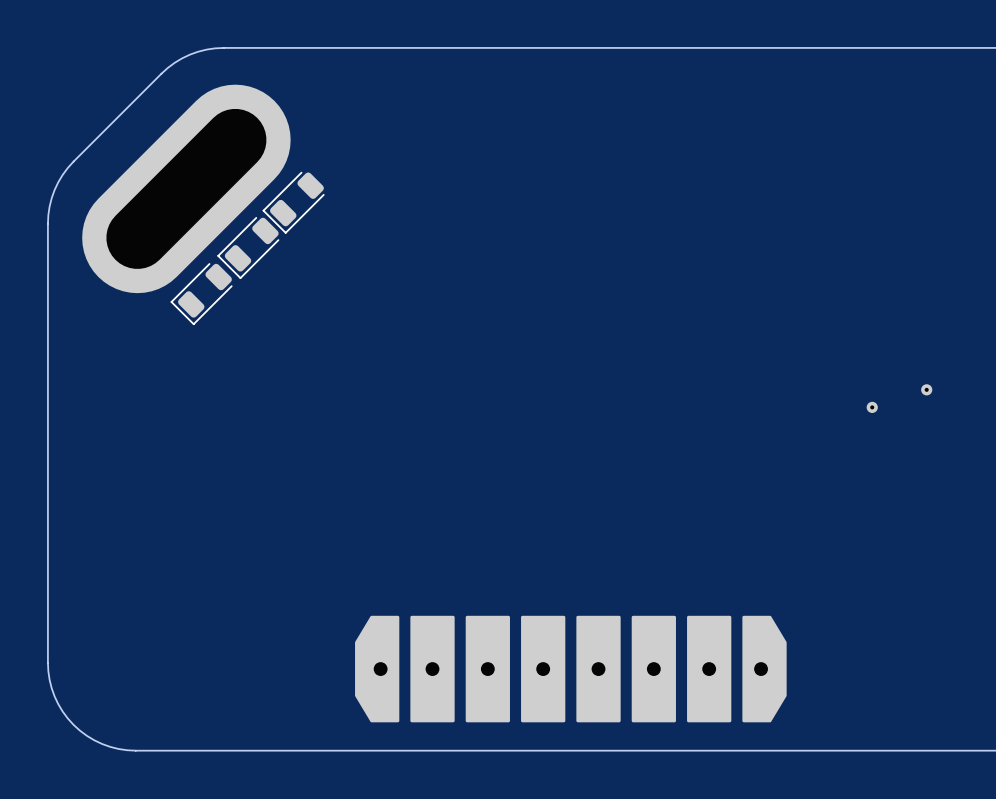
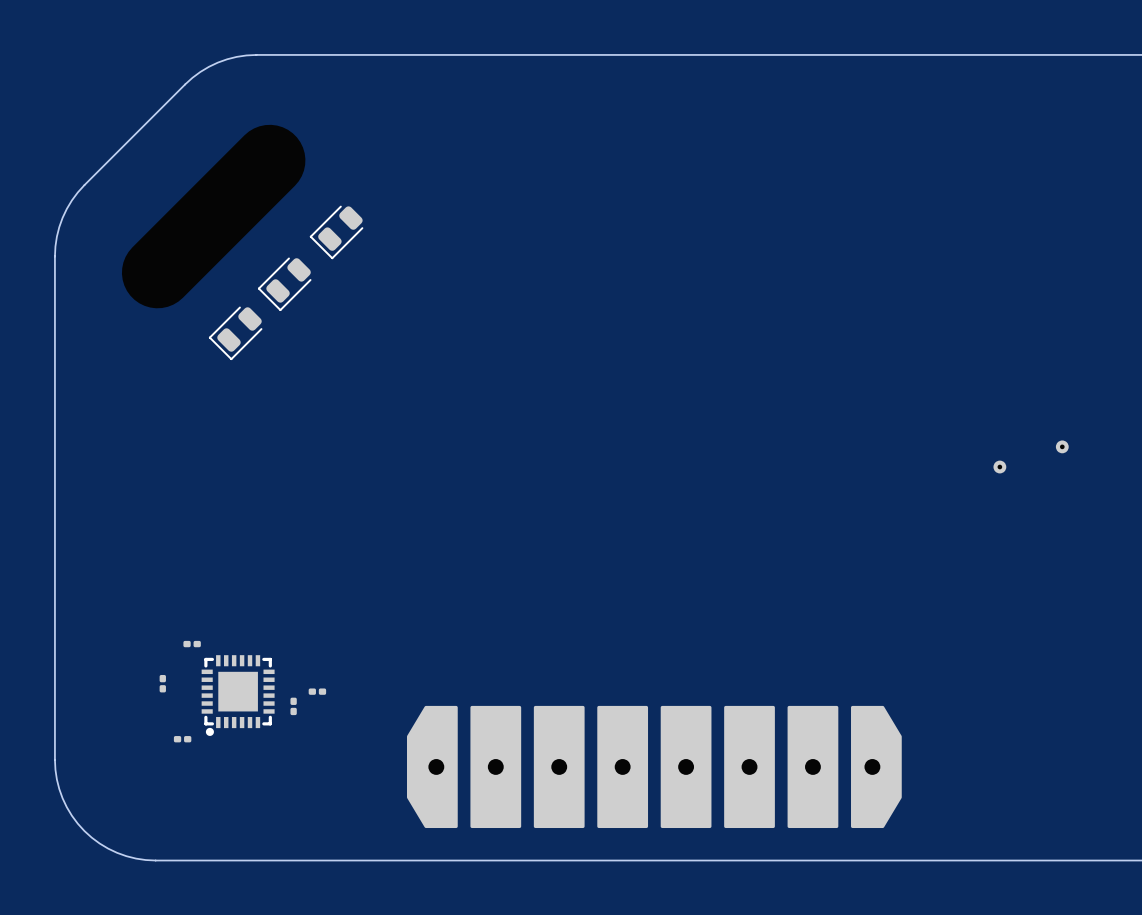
part footprint: [82, 84, 291, 294] -> [121, 124, 306, 309]
part footprint: [262, 171, 325, 234] -> [309, 205, 364, 260]
part footprint: [217, 217, 280, 279] -> [257, 257, 312, 312]
part footprint: [170, 263, 233, 326] -> [208, 306, 263, 361]
part: none -> (192, 644)
part: none -> (162, 683)
part: none -> (317, 691)
part: none -> (238, 695)
part: none -> (293, 706)
part: none -> (182, 739)

